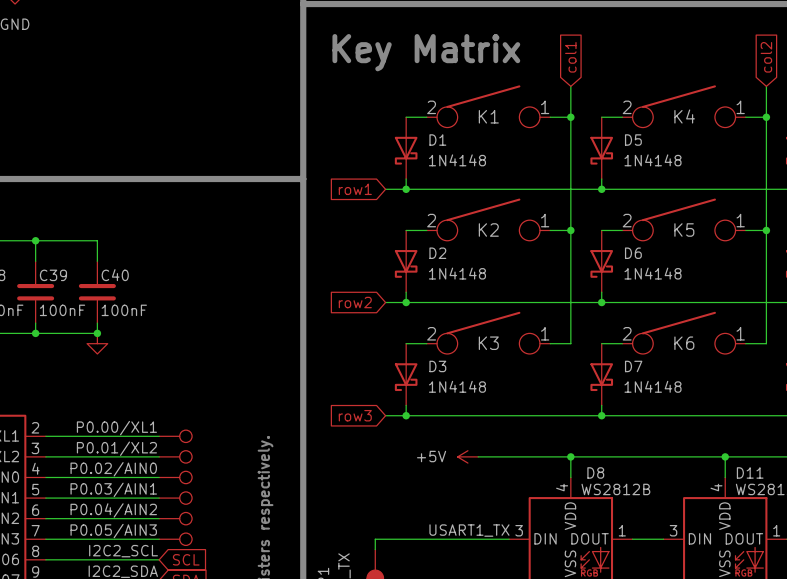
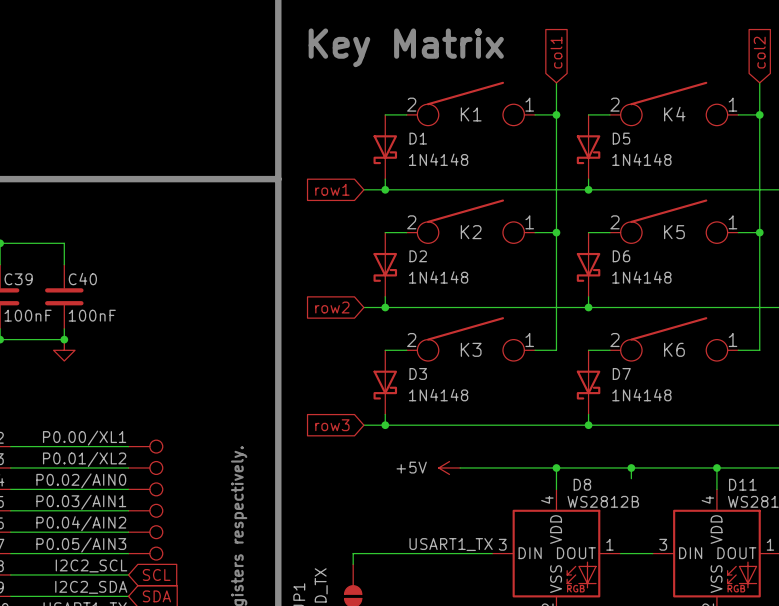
wire: none -> (631, 467) (631, 478)
junction: none -> (631, 467)

